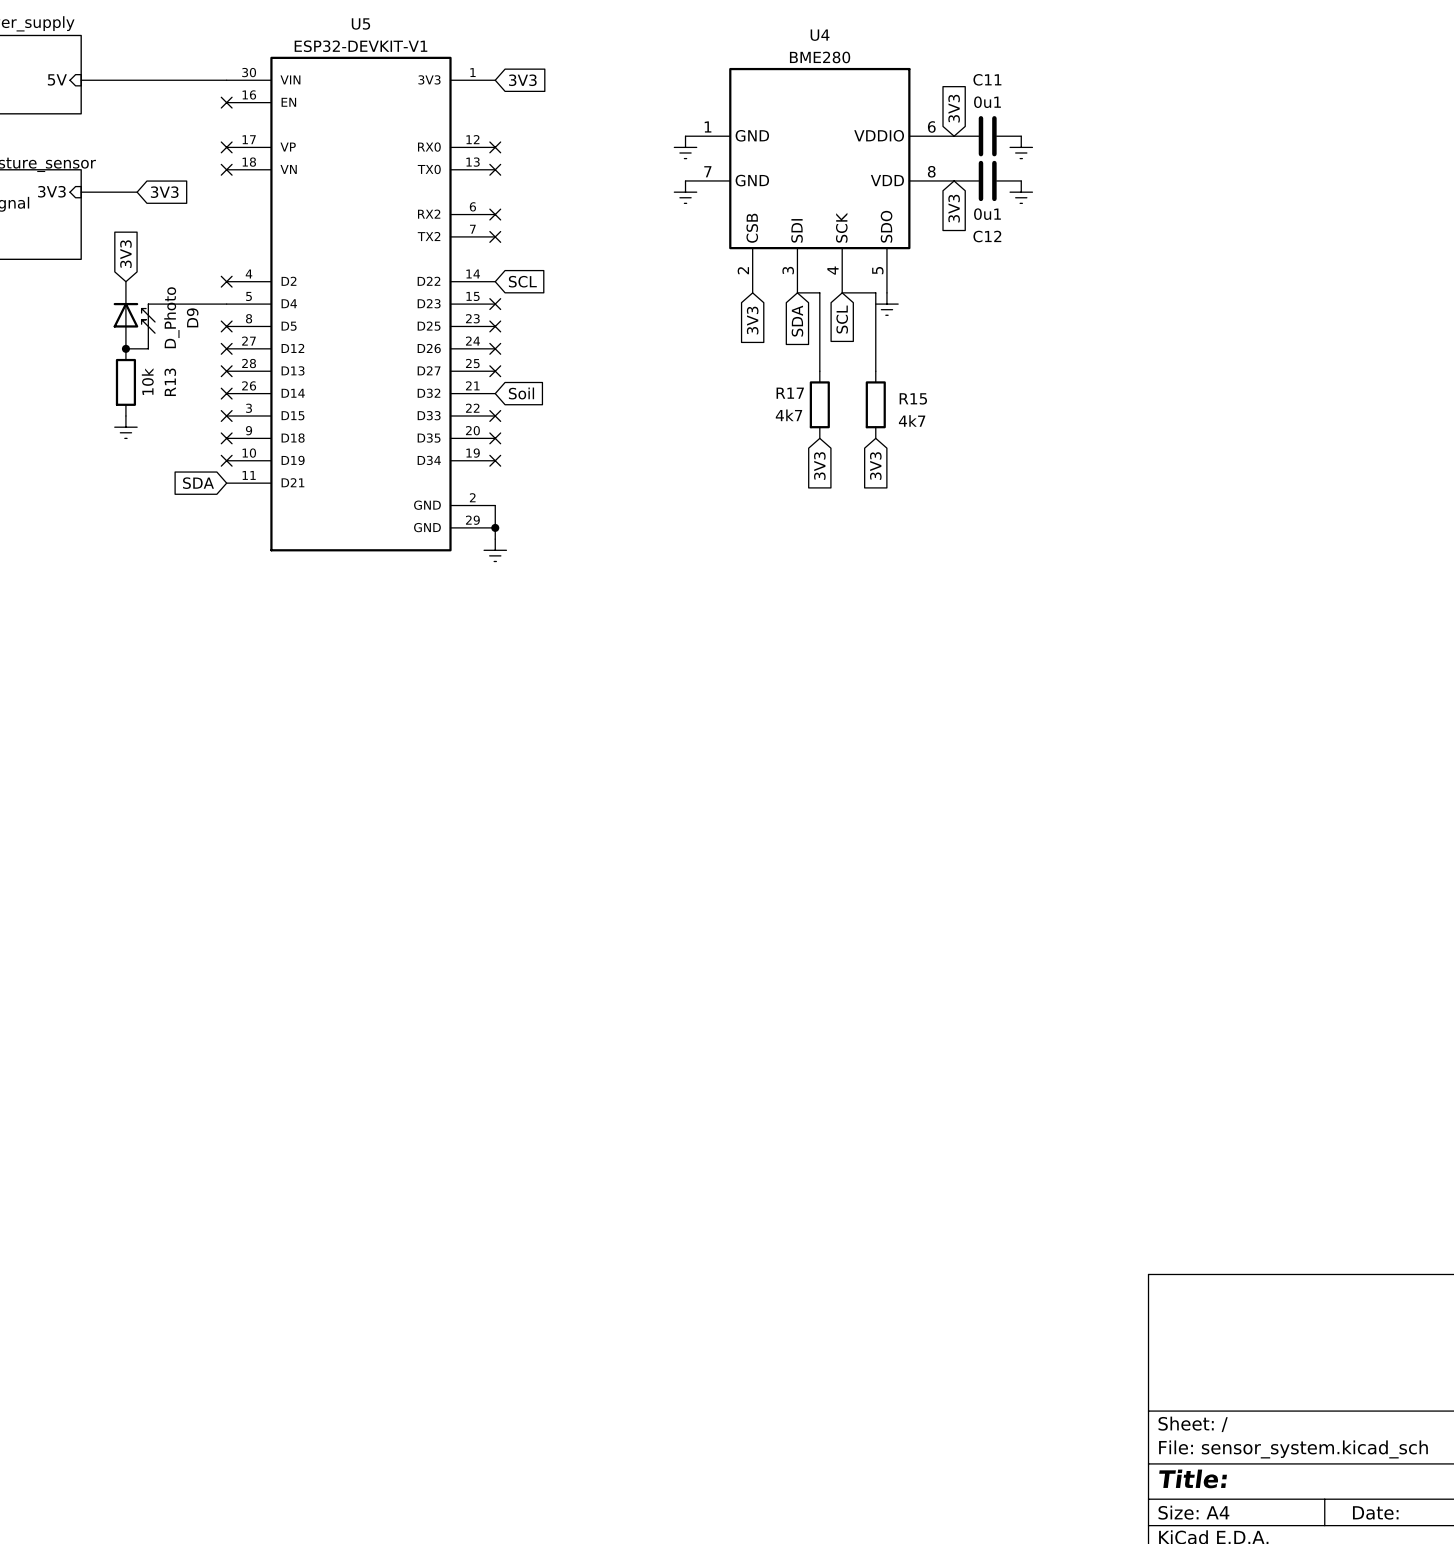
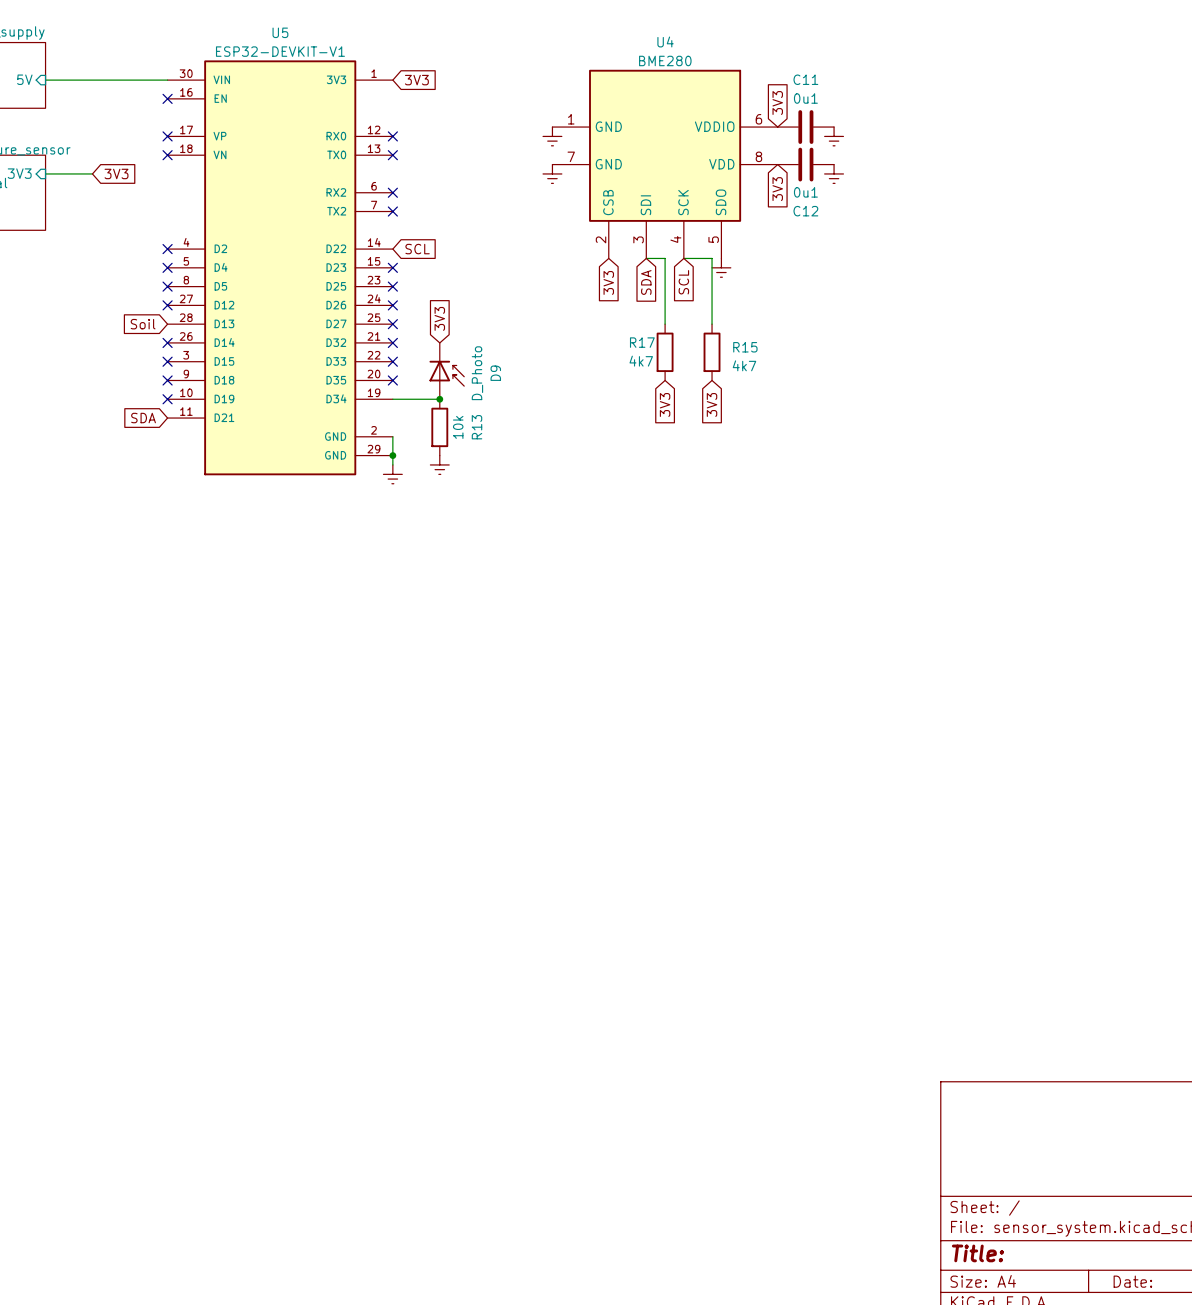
global label: 3V3 (125, 254) -> none
wire: (226, 304) (148, 304) (148, 348) (125, 348) -> none
no-connect mark: none -> (167, 267)
D9 position: (134, 315) -> (446, 371)
junction: (125, 348) -> none
global label: none -> 3V3 (439, 318)
global label: none -> Soil (143, 324)
no-connect mark: (226, 371) -> none
R13 position: (125, 382) -> (439, 427)
no-connect mark: none -> (392, 342)
global label: Soil (521, 393) -> none
power symbol: (125, 427) -> none
wire: none -> (392, 399) (439, 399)
no-connect mark: (495, 460) -> none
junction: none -> (439, 399)
power symbol: none -> (439, 464)

